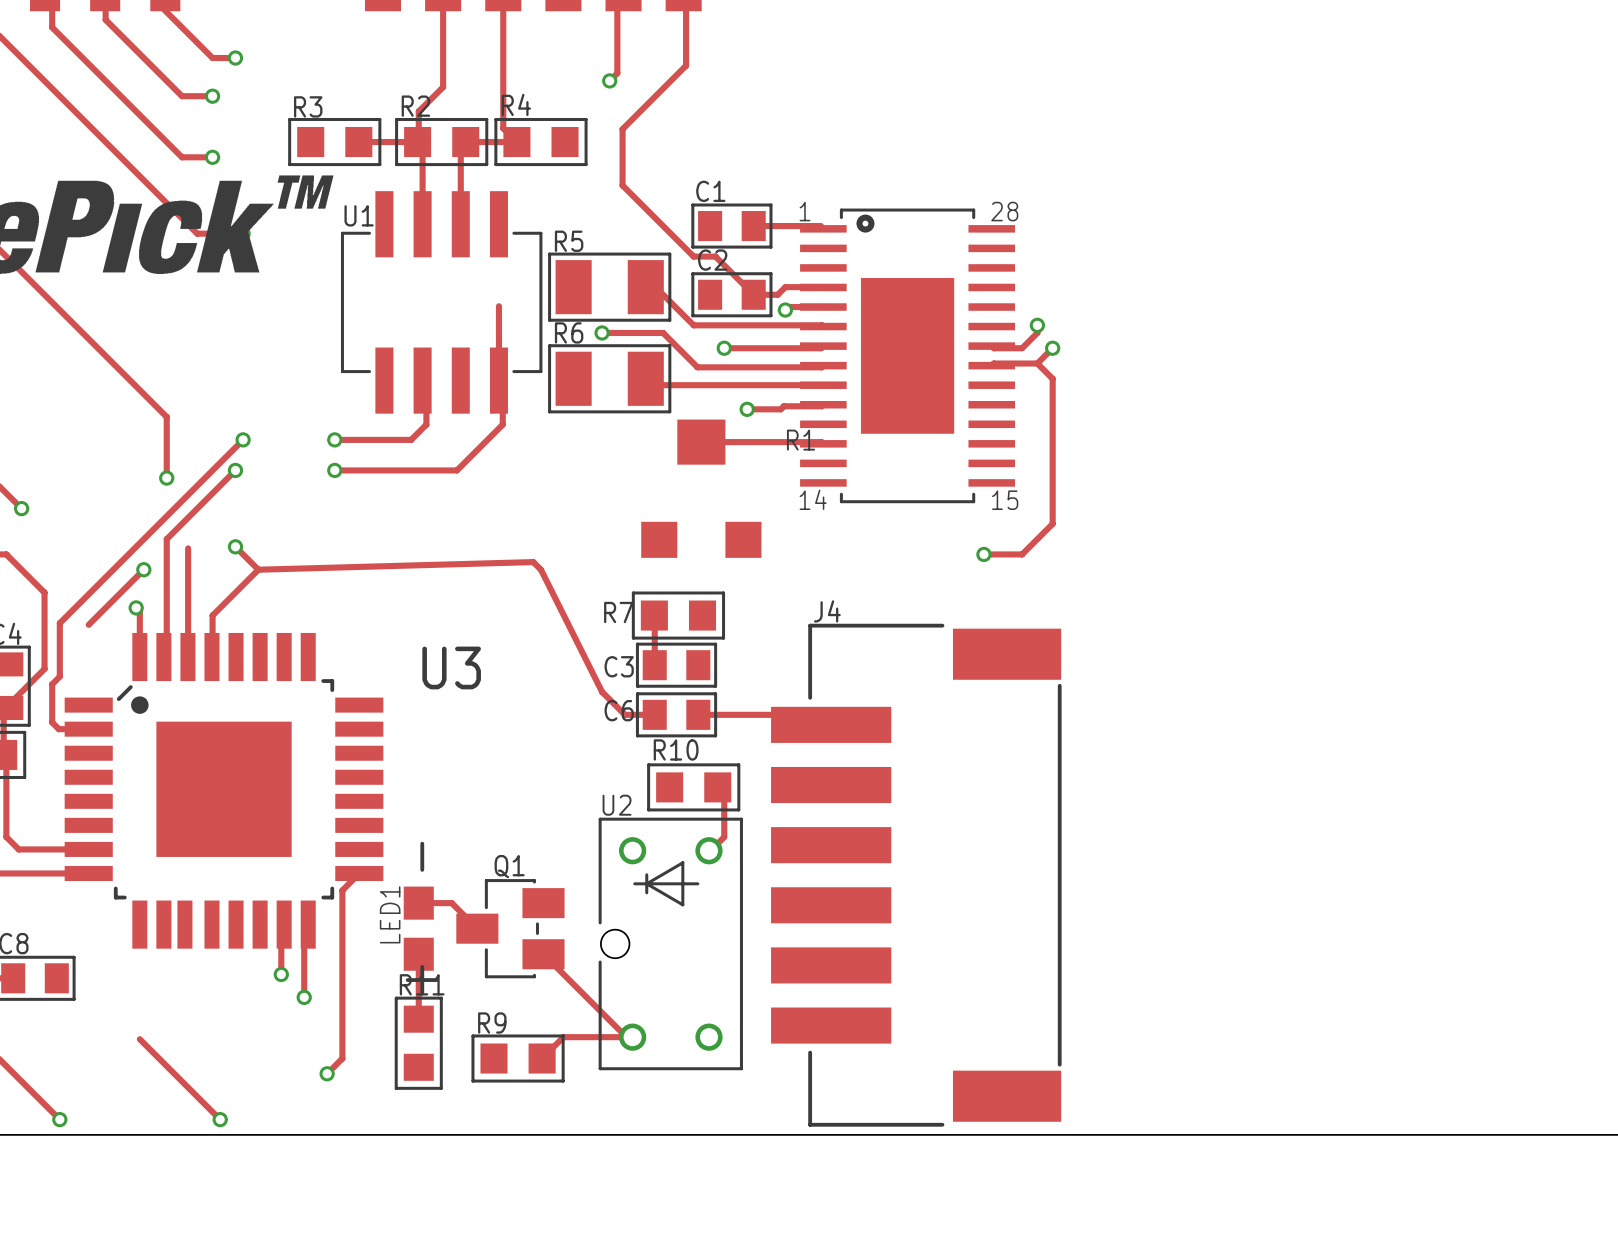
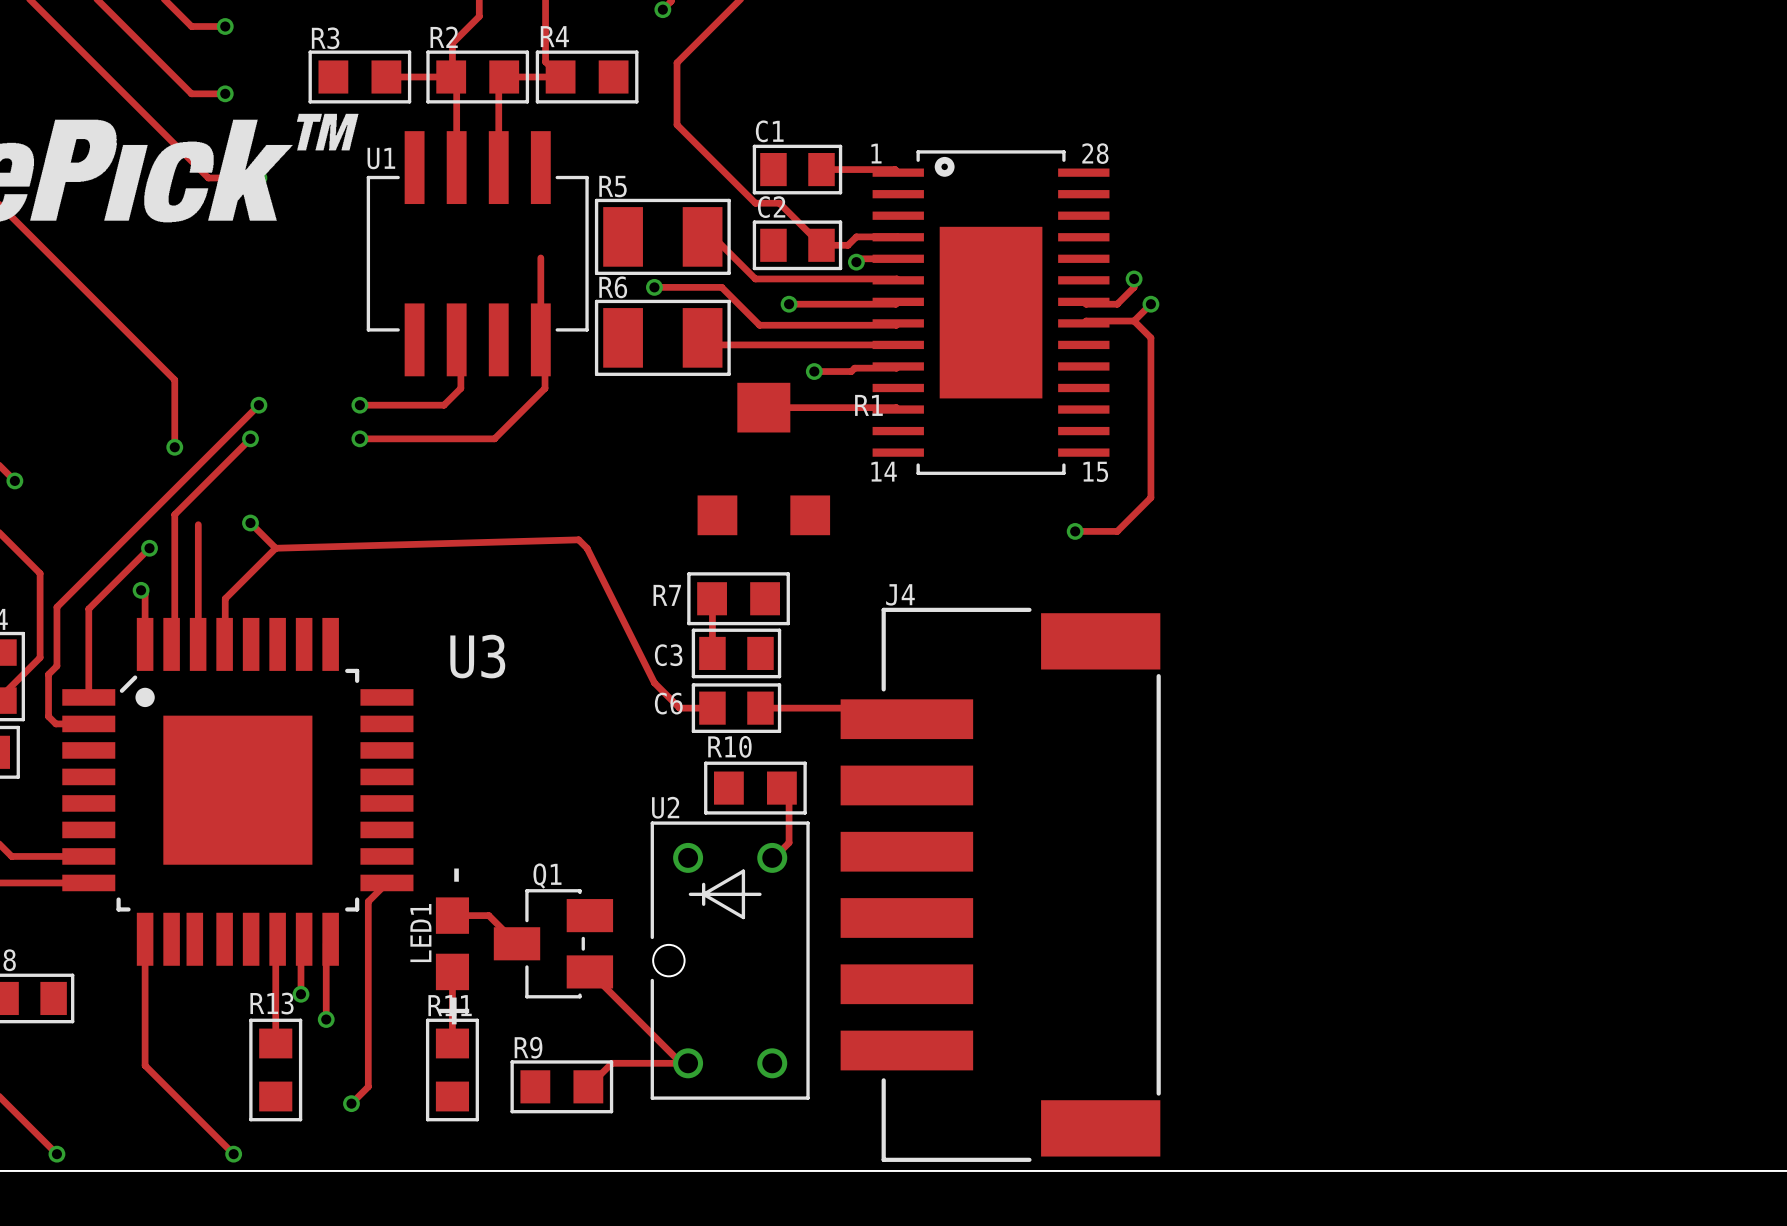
track: none -> (88, 608) (88, 697)
track: none -> (145, 939) (145, 1065)
track: none -> (277, 939) (275, 941) (275, 1043)
R13: none -> (275, 1069)

